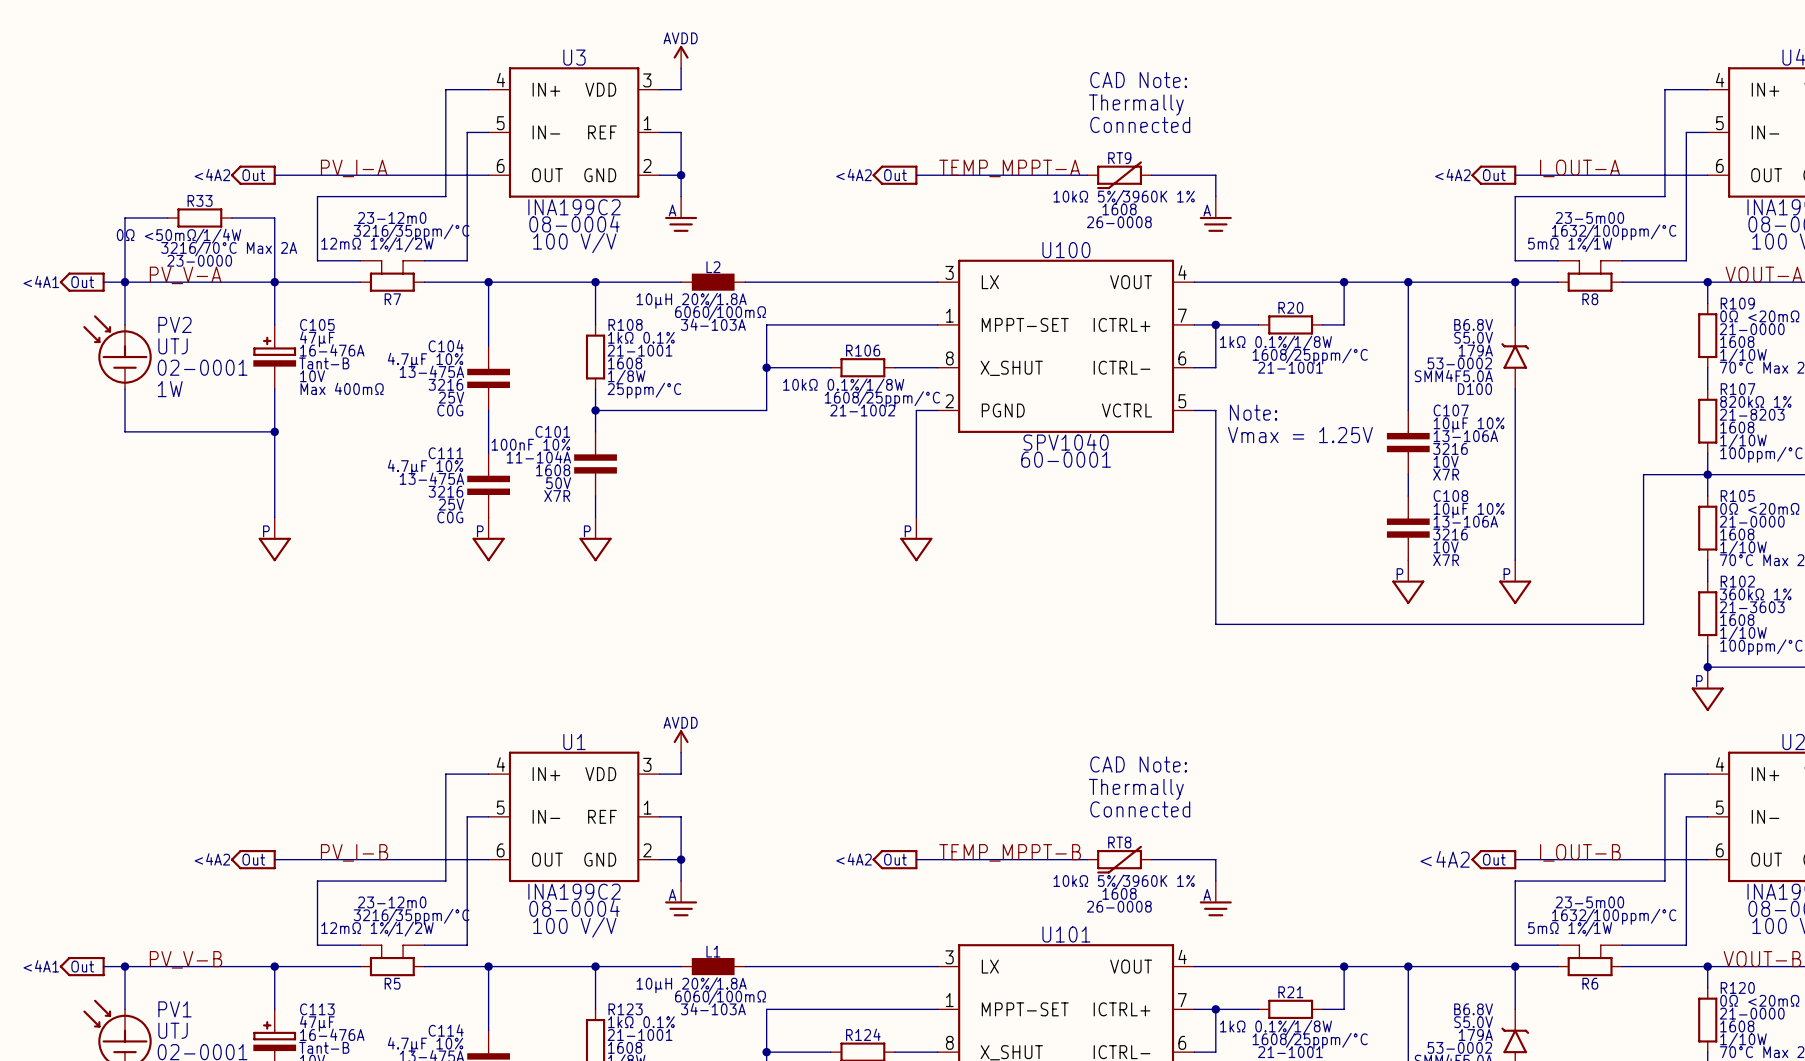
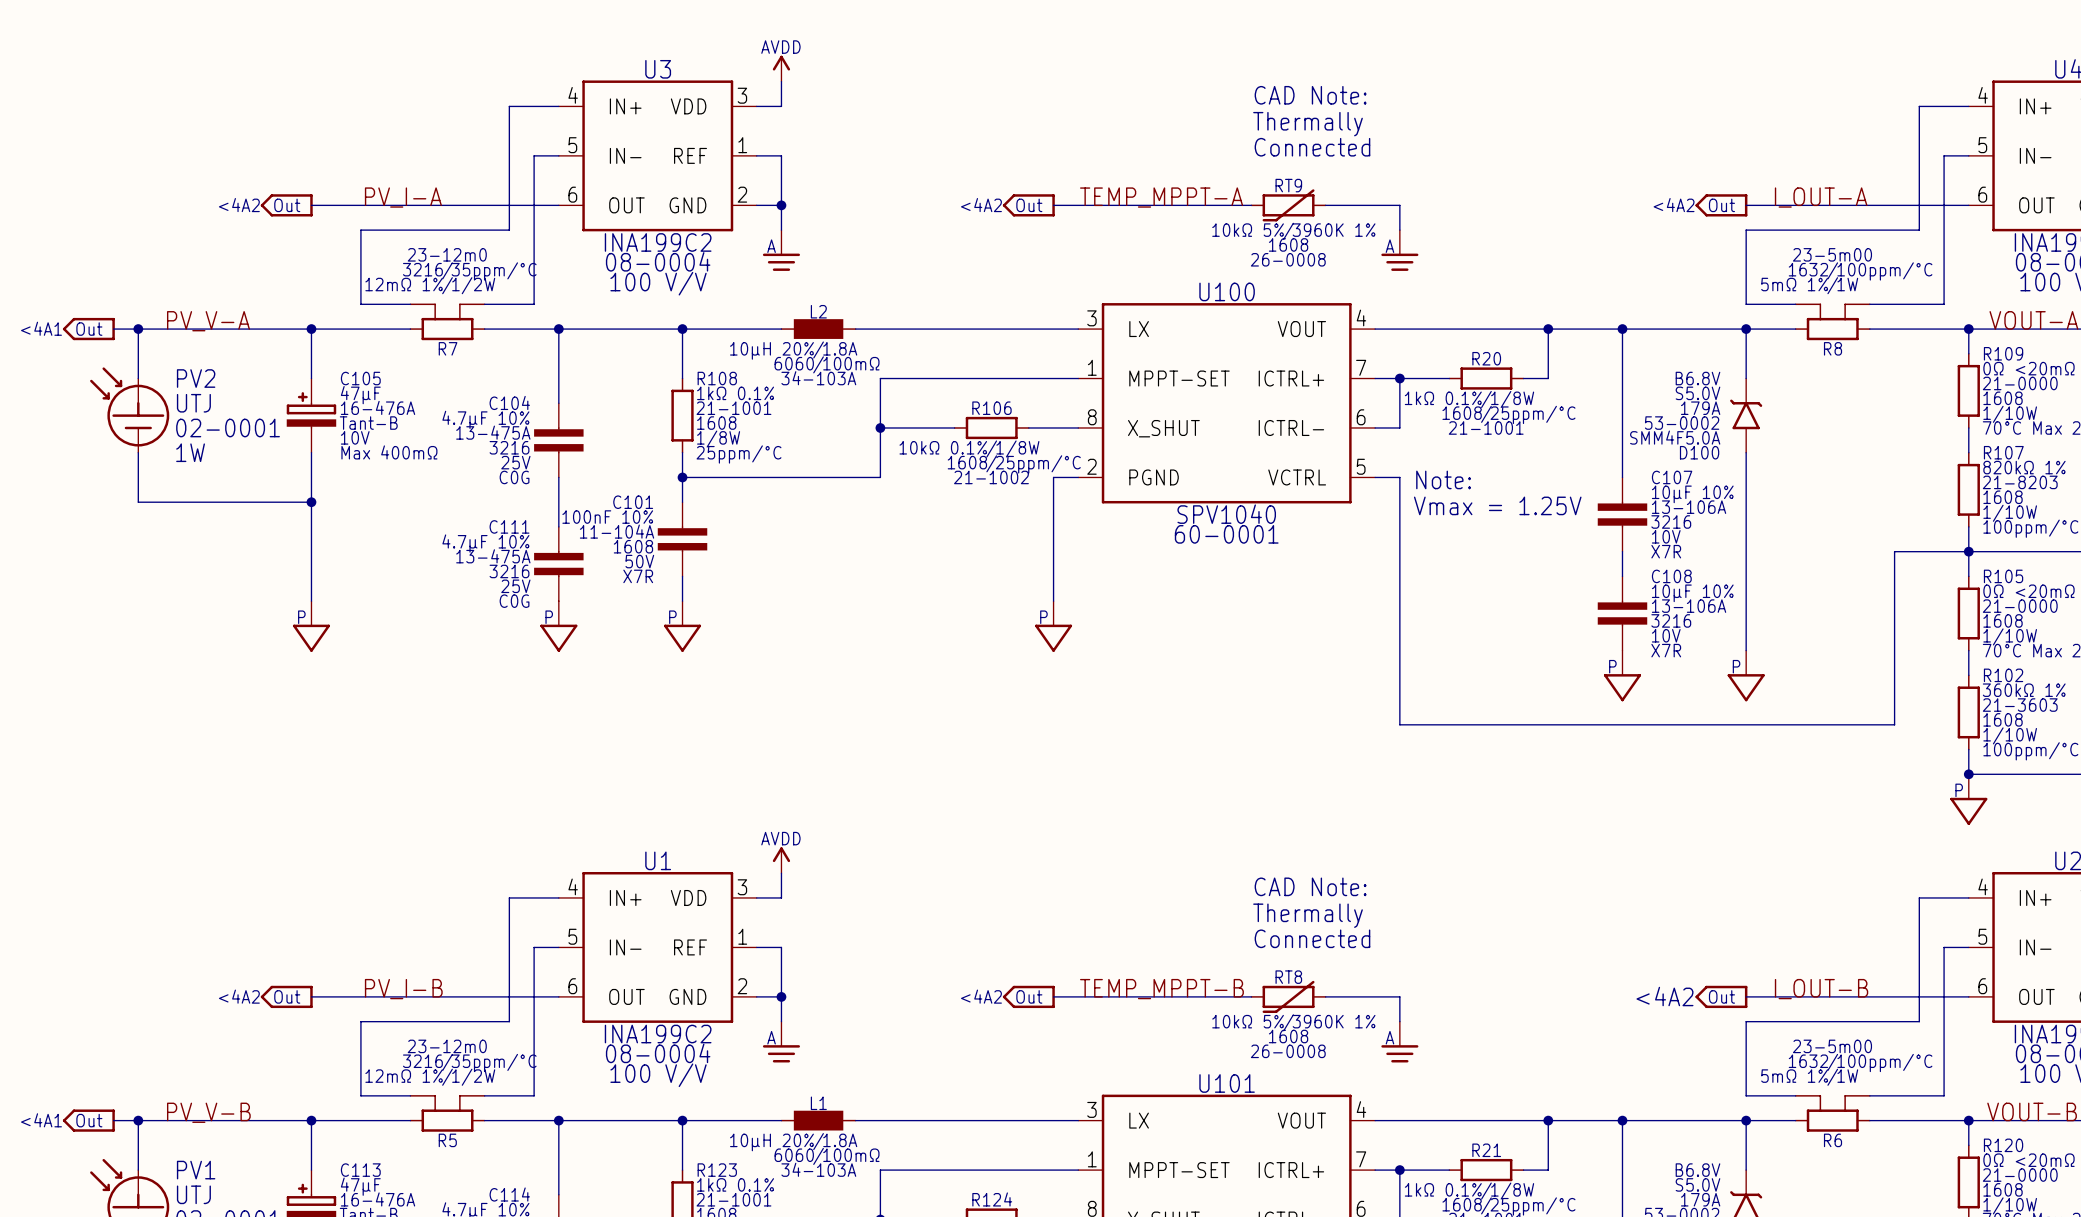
wire: (167, 218) (125, 218) (125, 282) -> none
R33: 0Ω <50mΩ (199, 218) -> none
wire: (231, 218) (274, 218) (274, 282) -> none

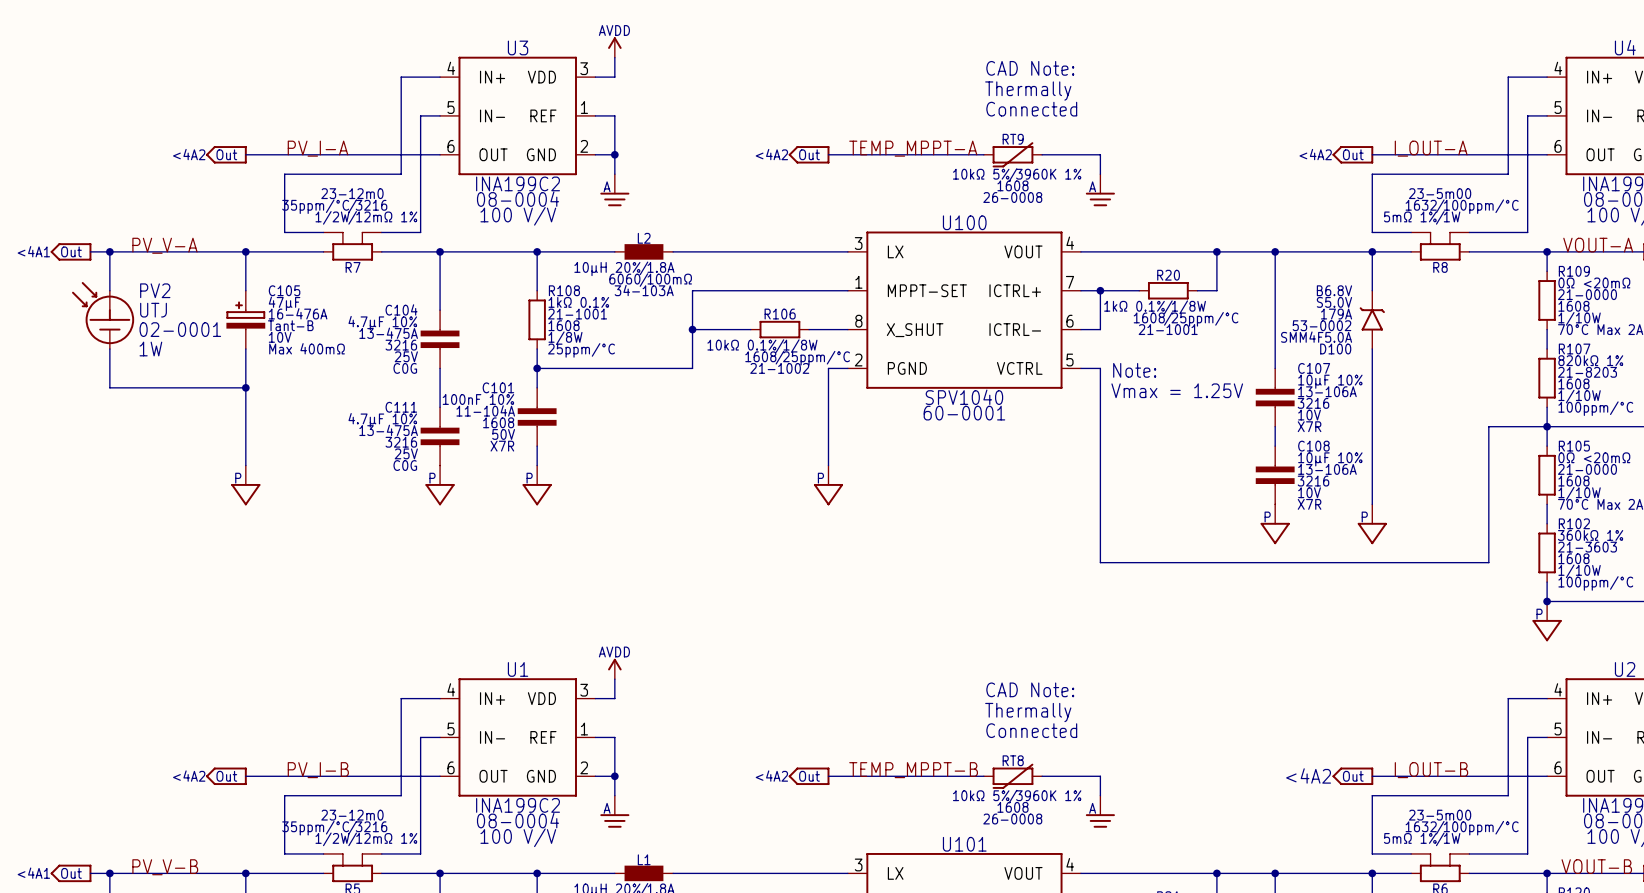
R7 text position: 3216 (422, 269) -> 3216 (371, 205)
R7 text position: 35ppm/°C (494, 271) -> 35ppm/°C (315, 206)
R7 value position: 12mΩ 1% (404, 284) -> 12mΩ 1% (386, 216)
R7 text position: 1/2W (473, 285) -> 1/2W (332, 217)
R5 text position: 3216 (422, 1061) -> 3216 (371, 826)
R5 text position: 35ppm/°C (494, 1063) -> 35ppm/°C (315, 828)
R5 value position: 12mΩ 1% (404, 1076) -> 12mΩ 1% (386, 838)
R5 text position: 1/2W (473, 1077) -> 1/2W (332, 839)

